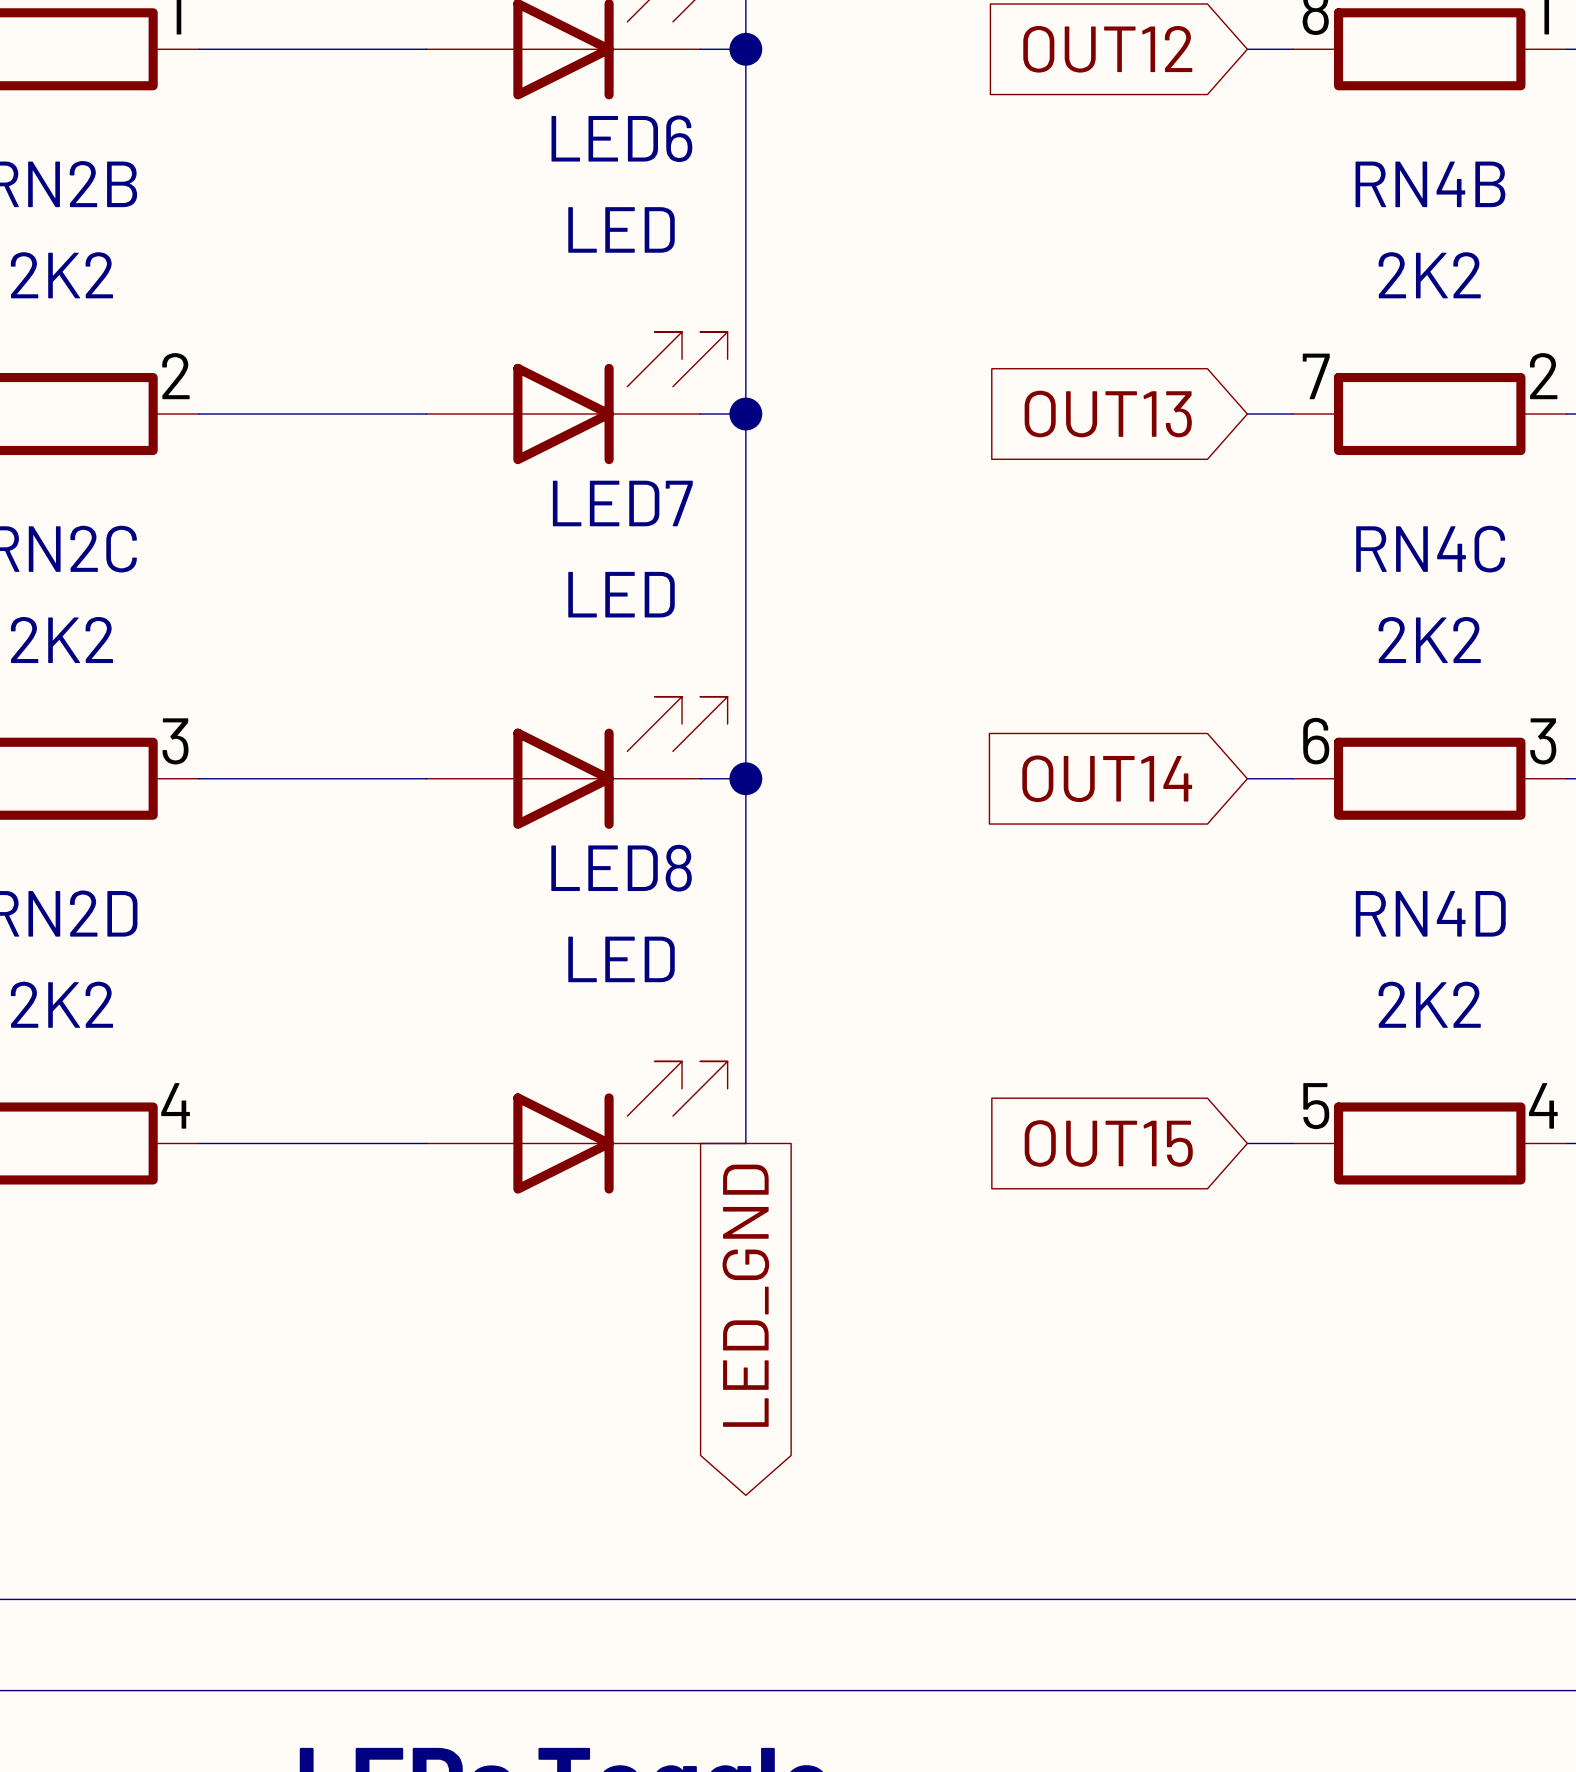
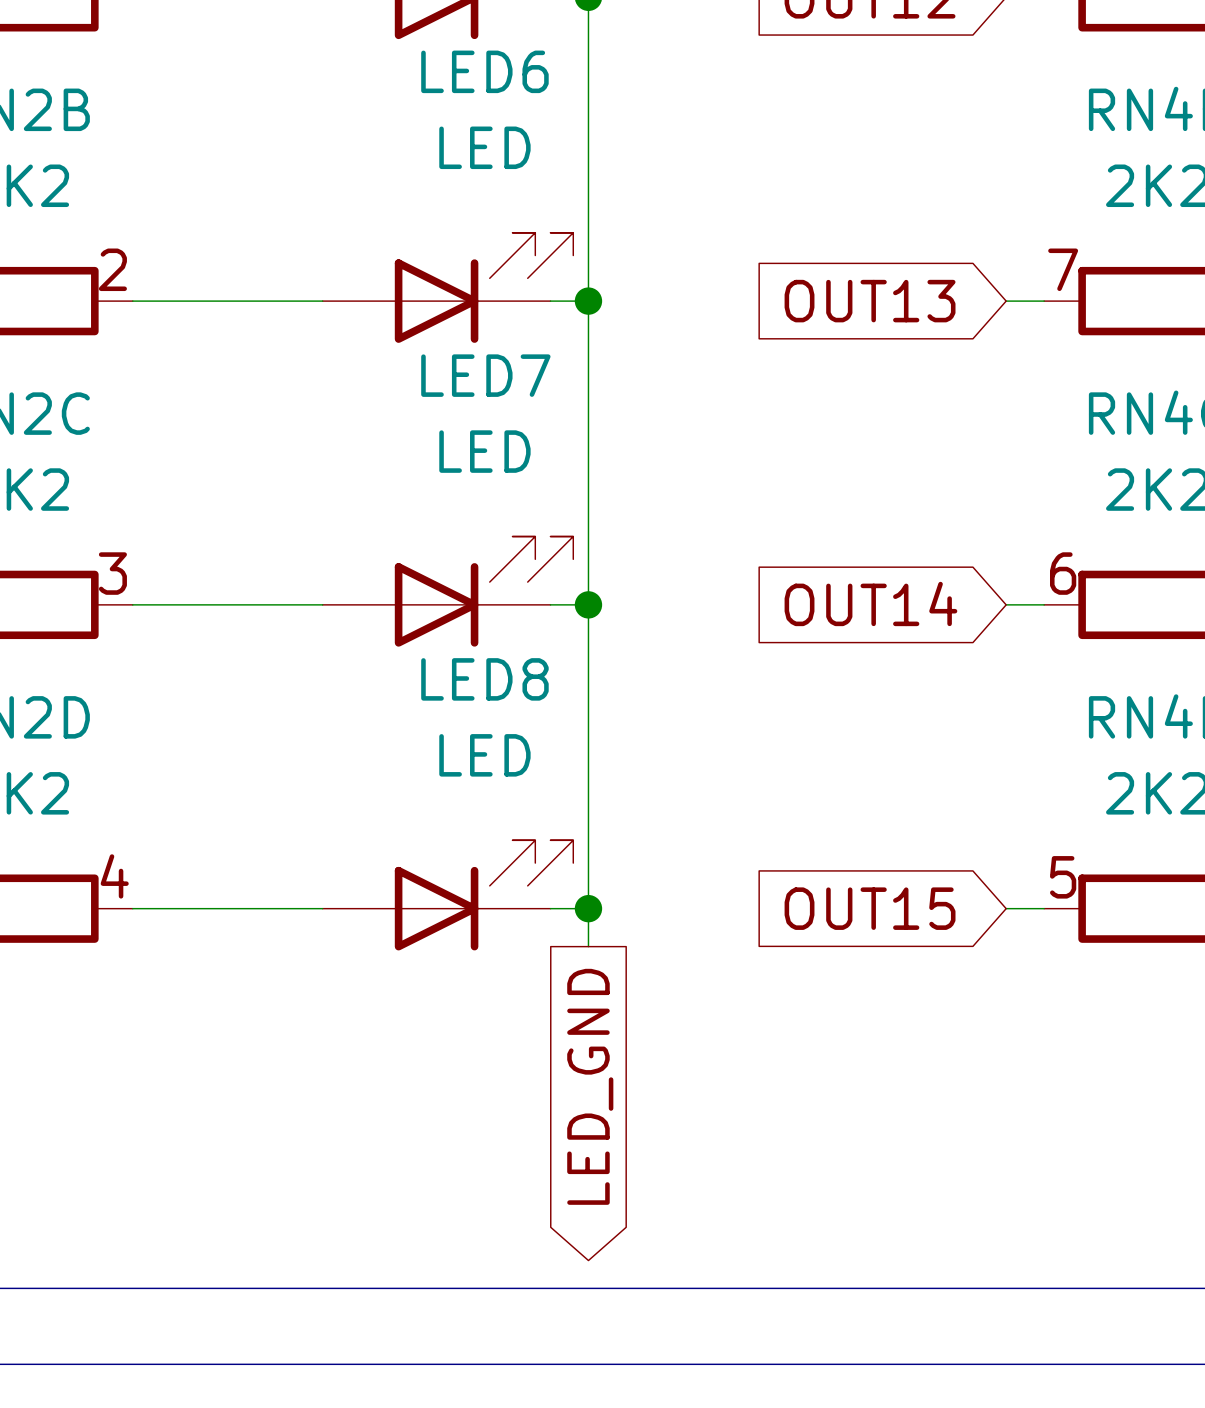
wire: none -> (588, 908) (588, 946)
junction: none -> (588, 908)
global label position: LED_GND (745, 1295) -> LED_GND (590, 1086)

